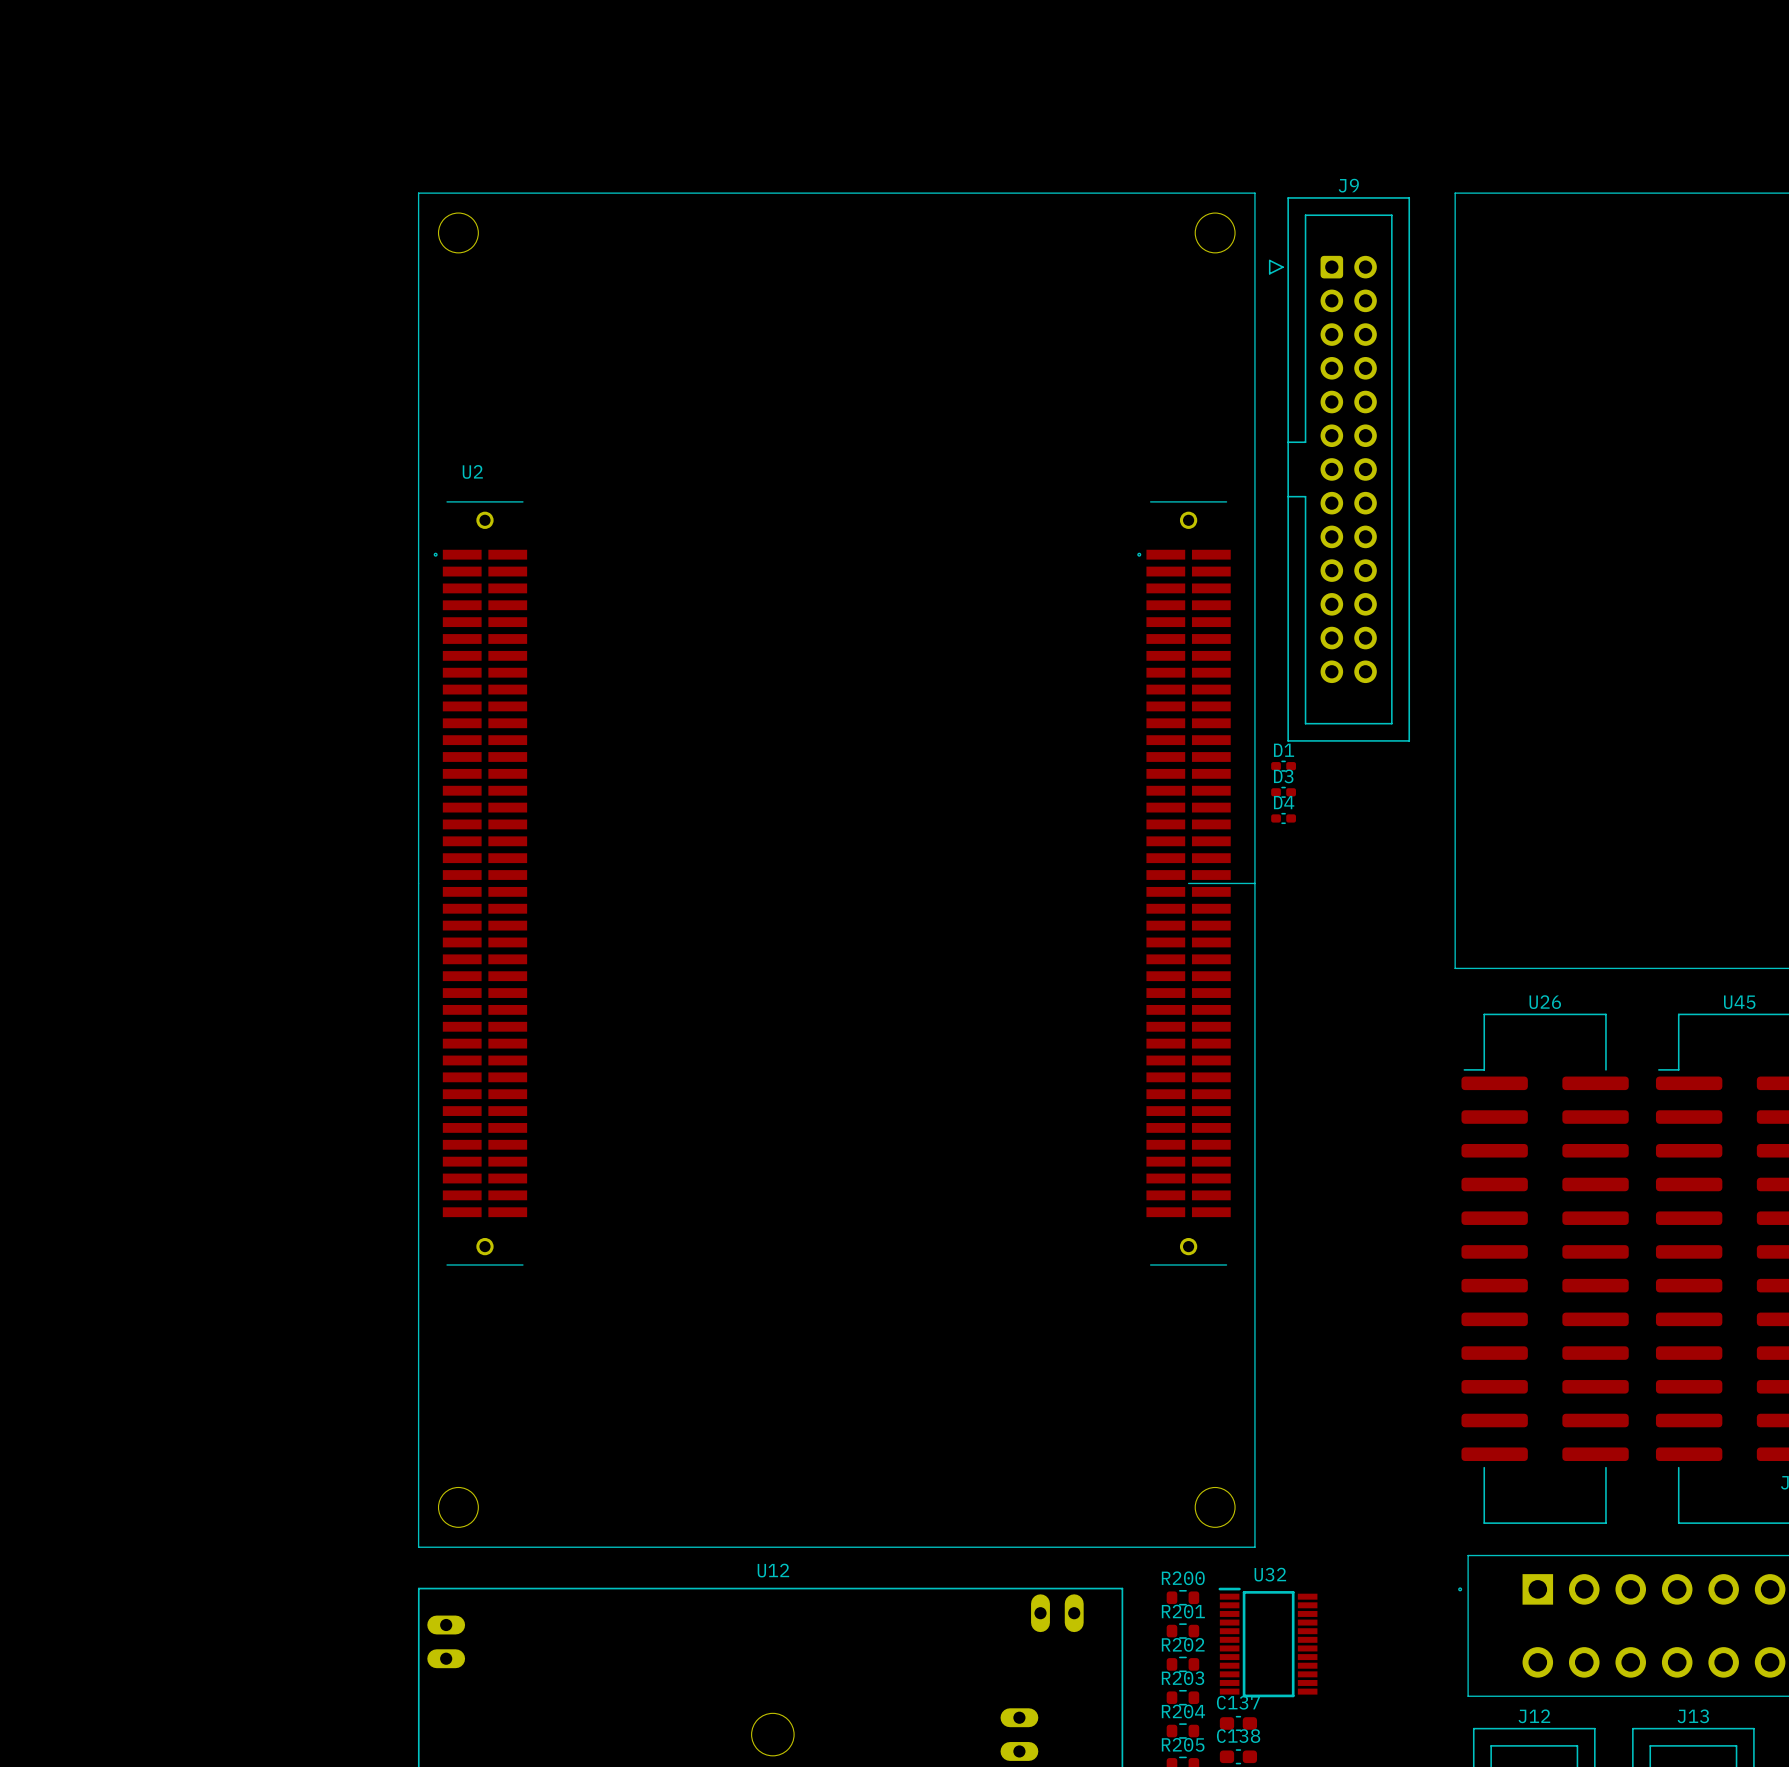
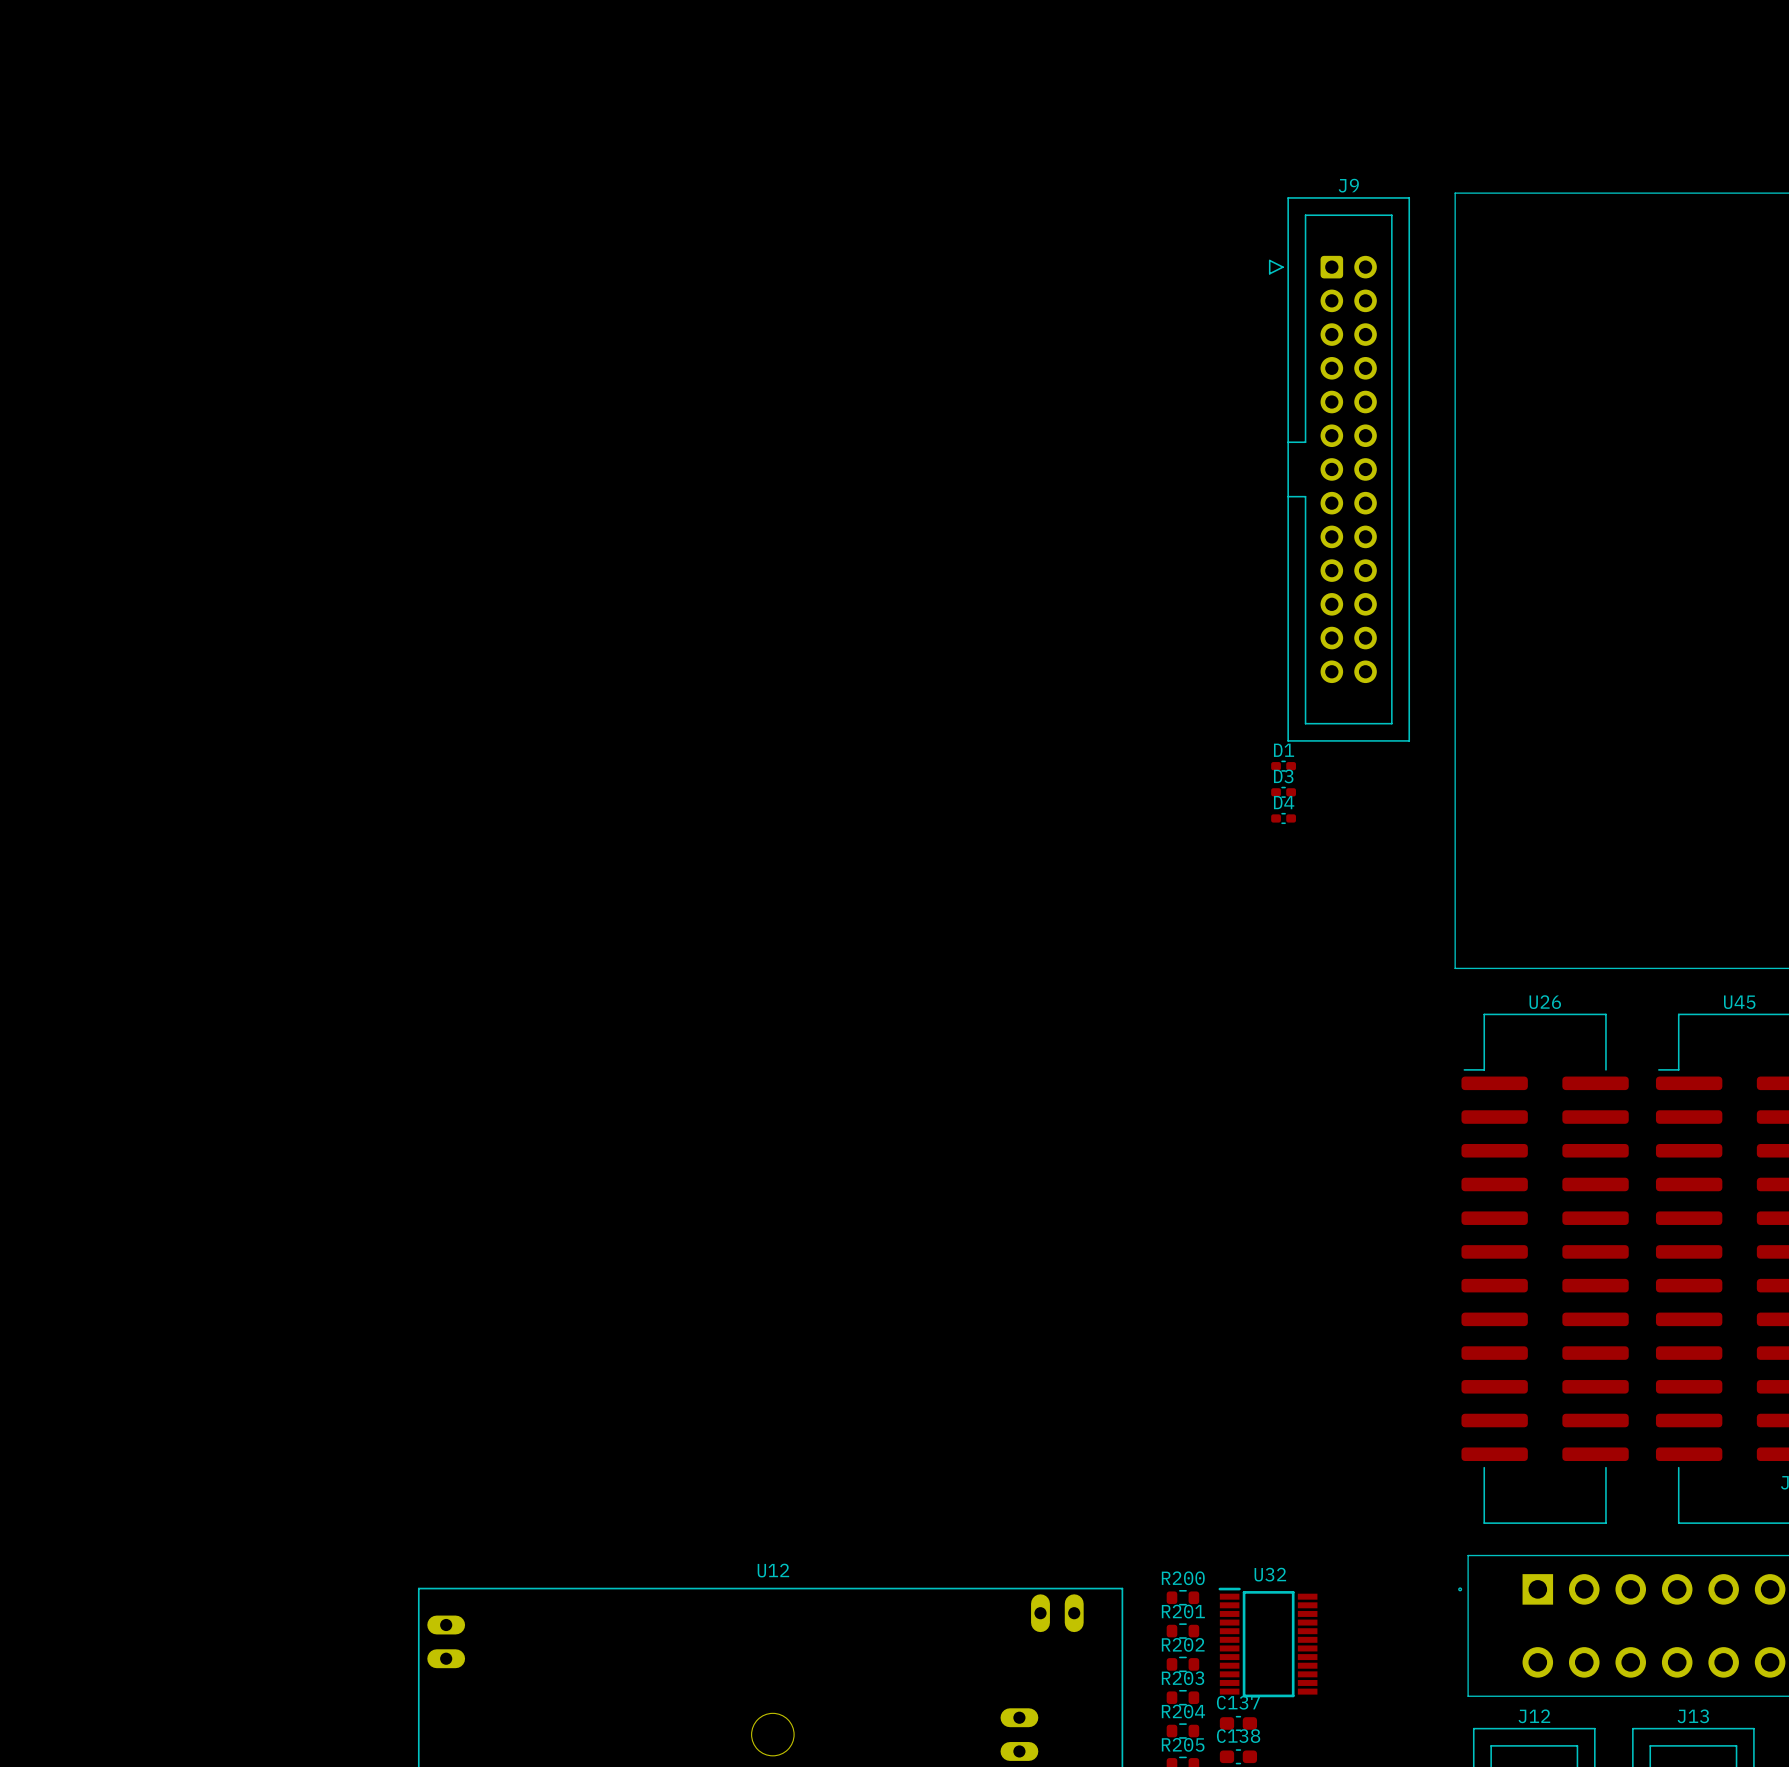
U2: (836, 870) -> none

